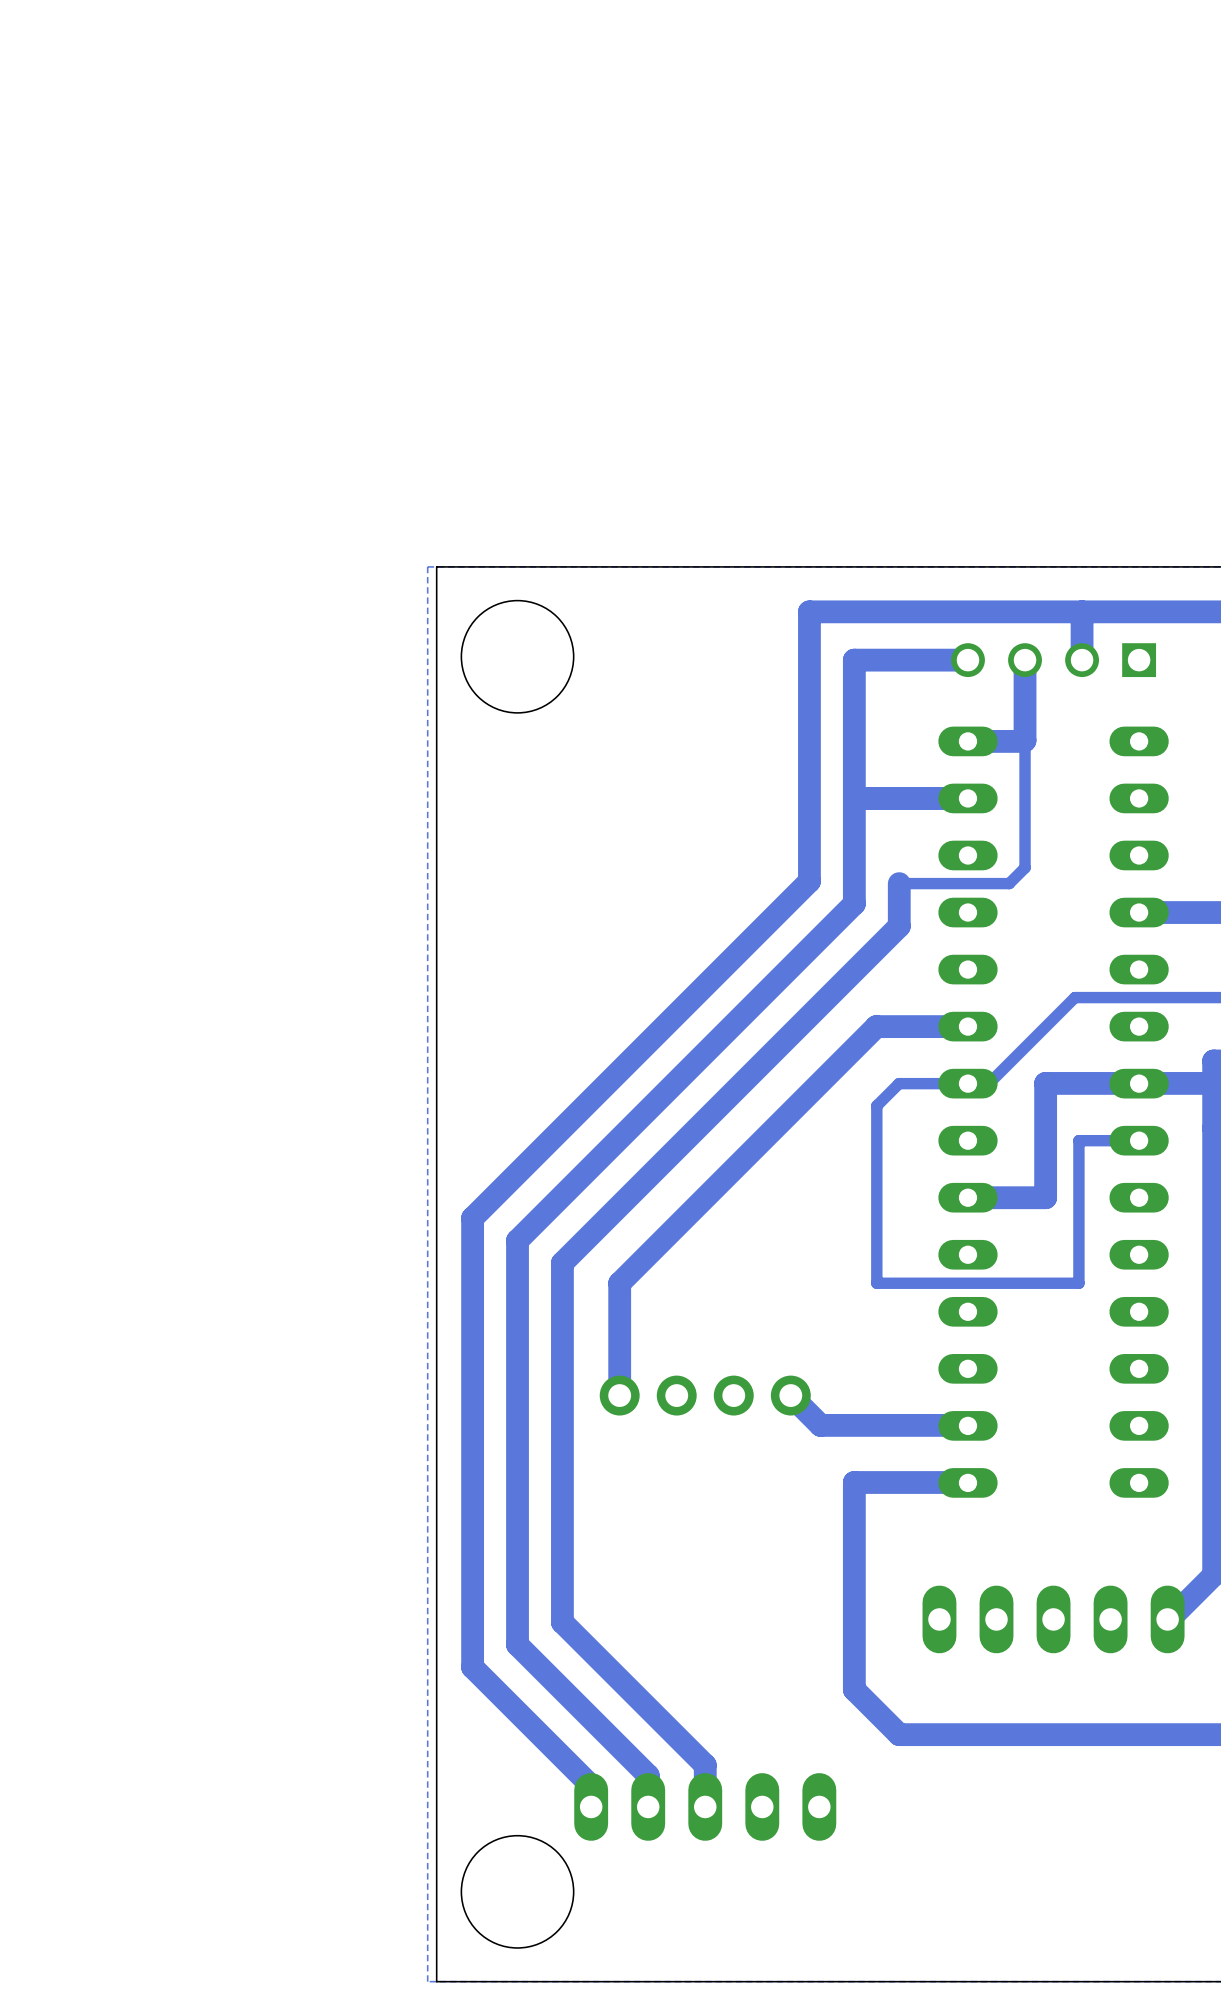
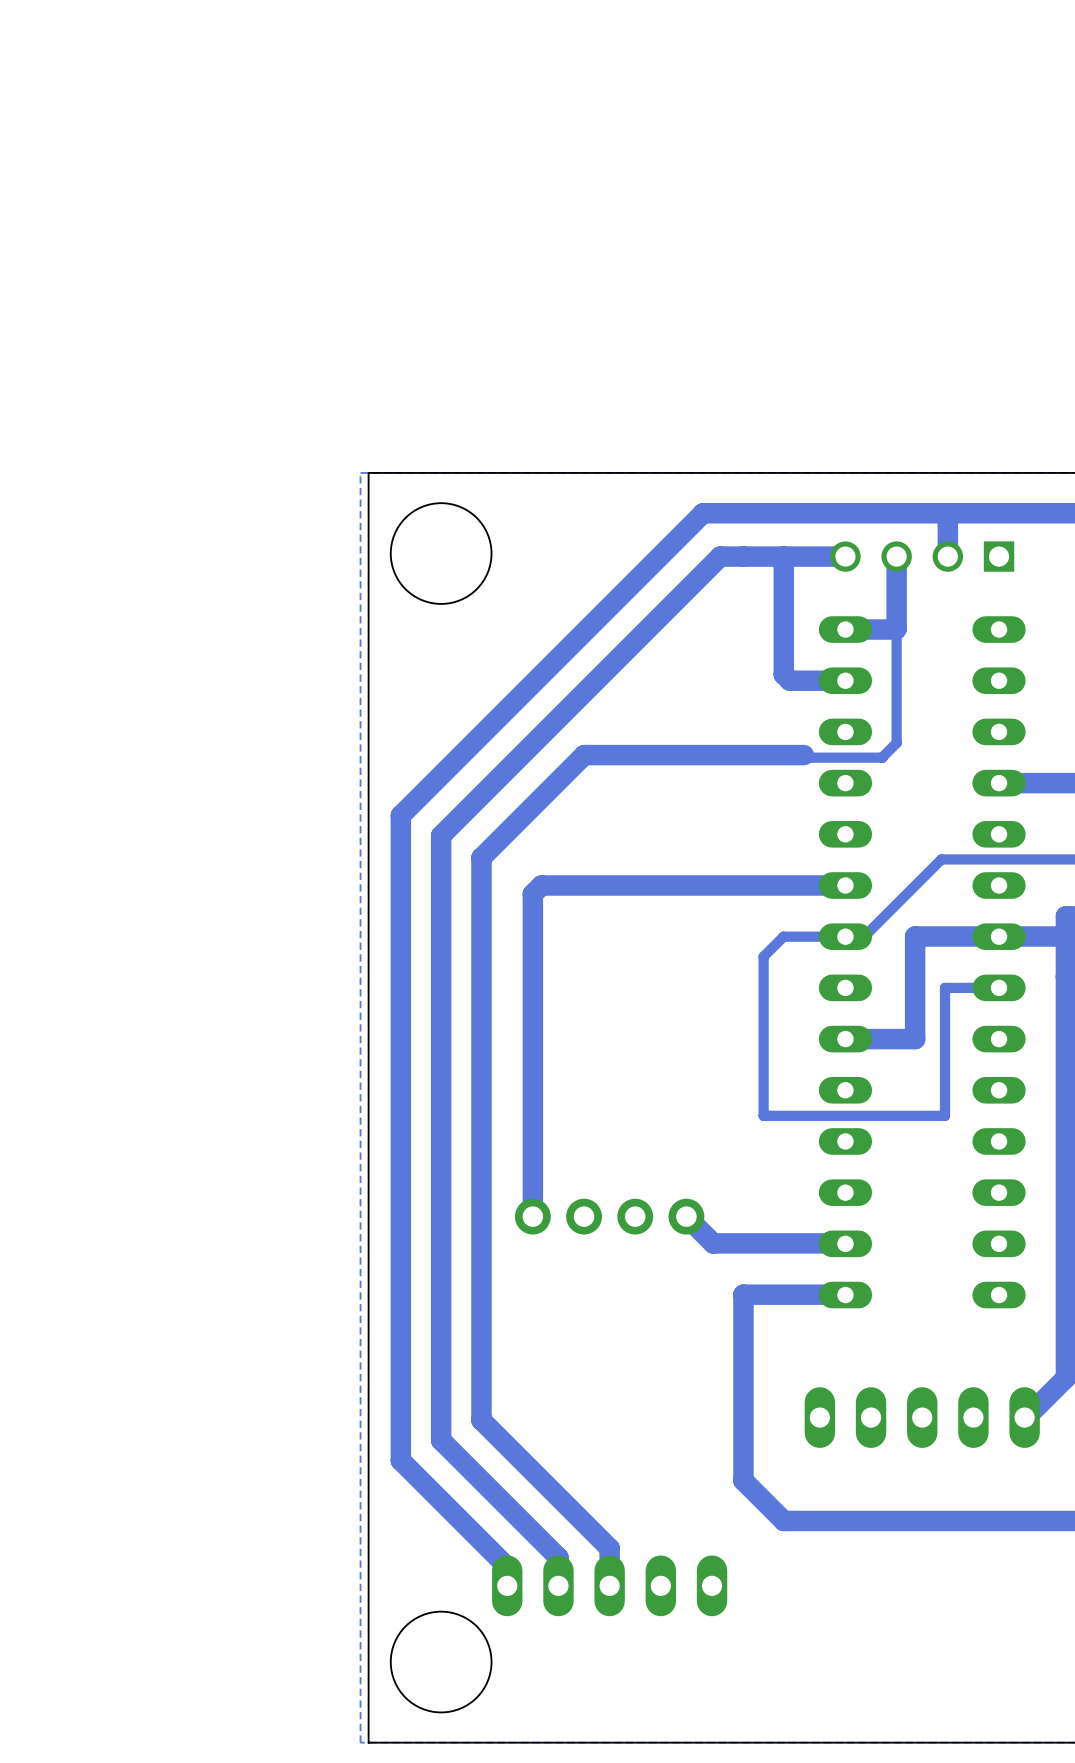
track: (809, 611) (809, 881) (472, 1218) -> (703, 513) (400, 815) (400, 1057)
track: (854, 660) (854, 903) (517, 1240) -> (743, 556) (720, 556) (441, 835) (441, 1077)
track: (906, 798) (854, 798) -> (790, 680) (783, 674) (783, 556)
track: (1009, 883) (899, 883) (899, 926) (562, 1263) -> (882, 757) (806, 757) (803, 755) (584, 755) (481, 857) (481, 1097)
track: (876, 1026) (619, 1283) -> (763, 885) (541, 885) (532, 894) (532, 1115)

